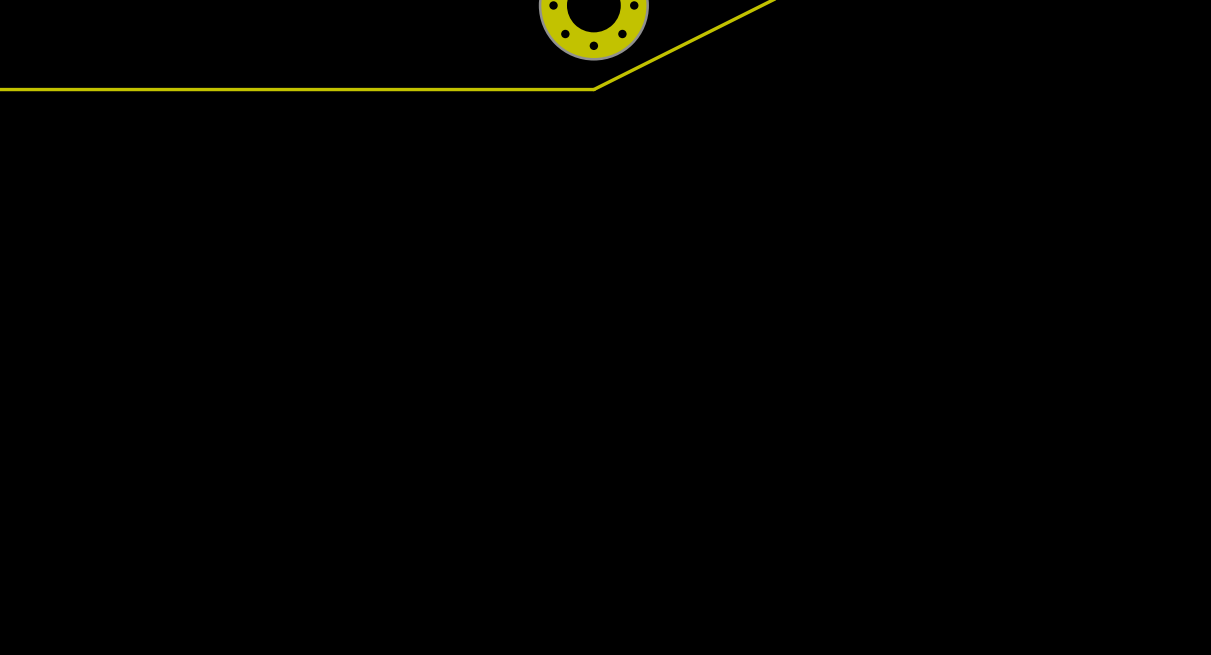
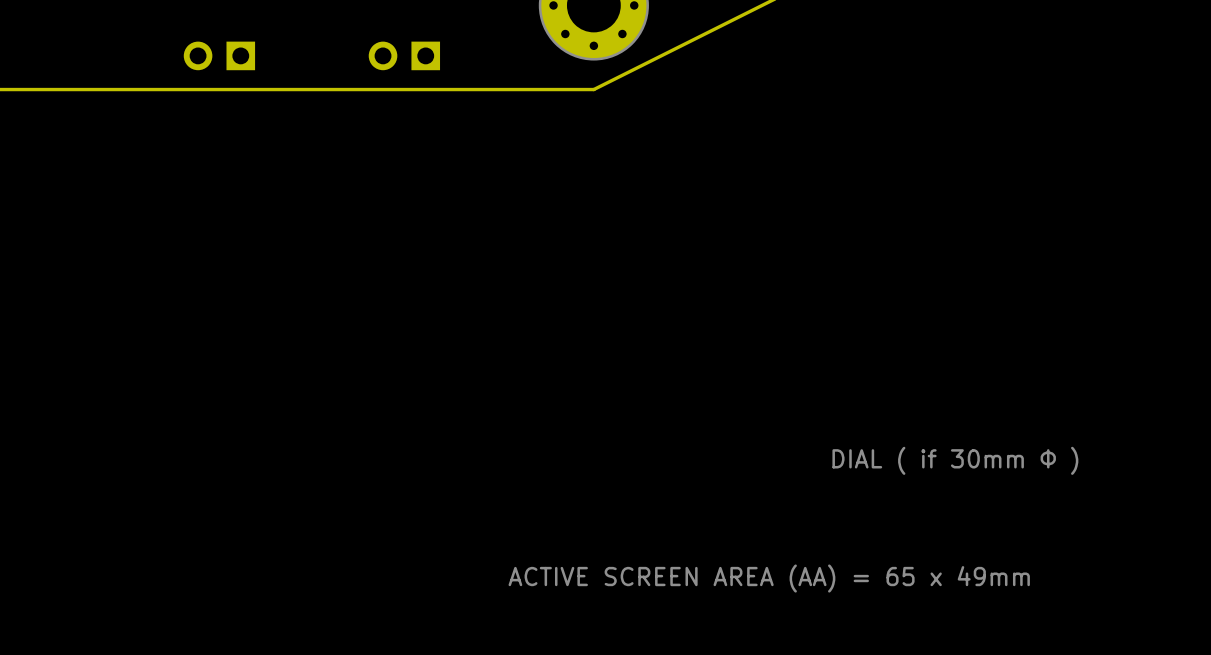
part: none -> (219, 55)
part: none -> (404, 55)
text: none -> DIAL ( if 30mm Φ ) (955, 460)
text: none -> ACTIVE SCREEN AREA (AA) = 65 x 49mm (769, 578)

